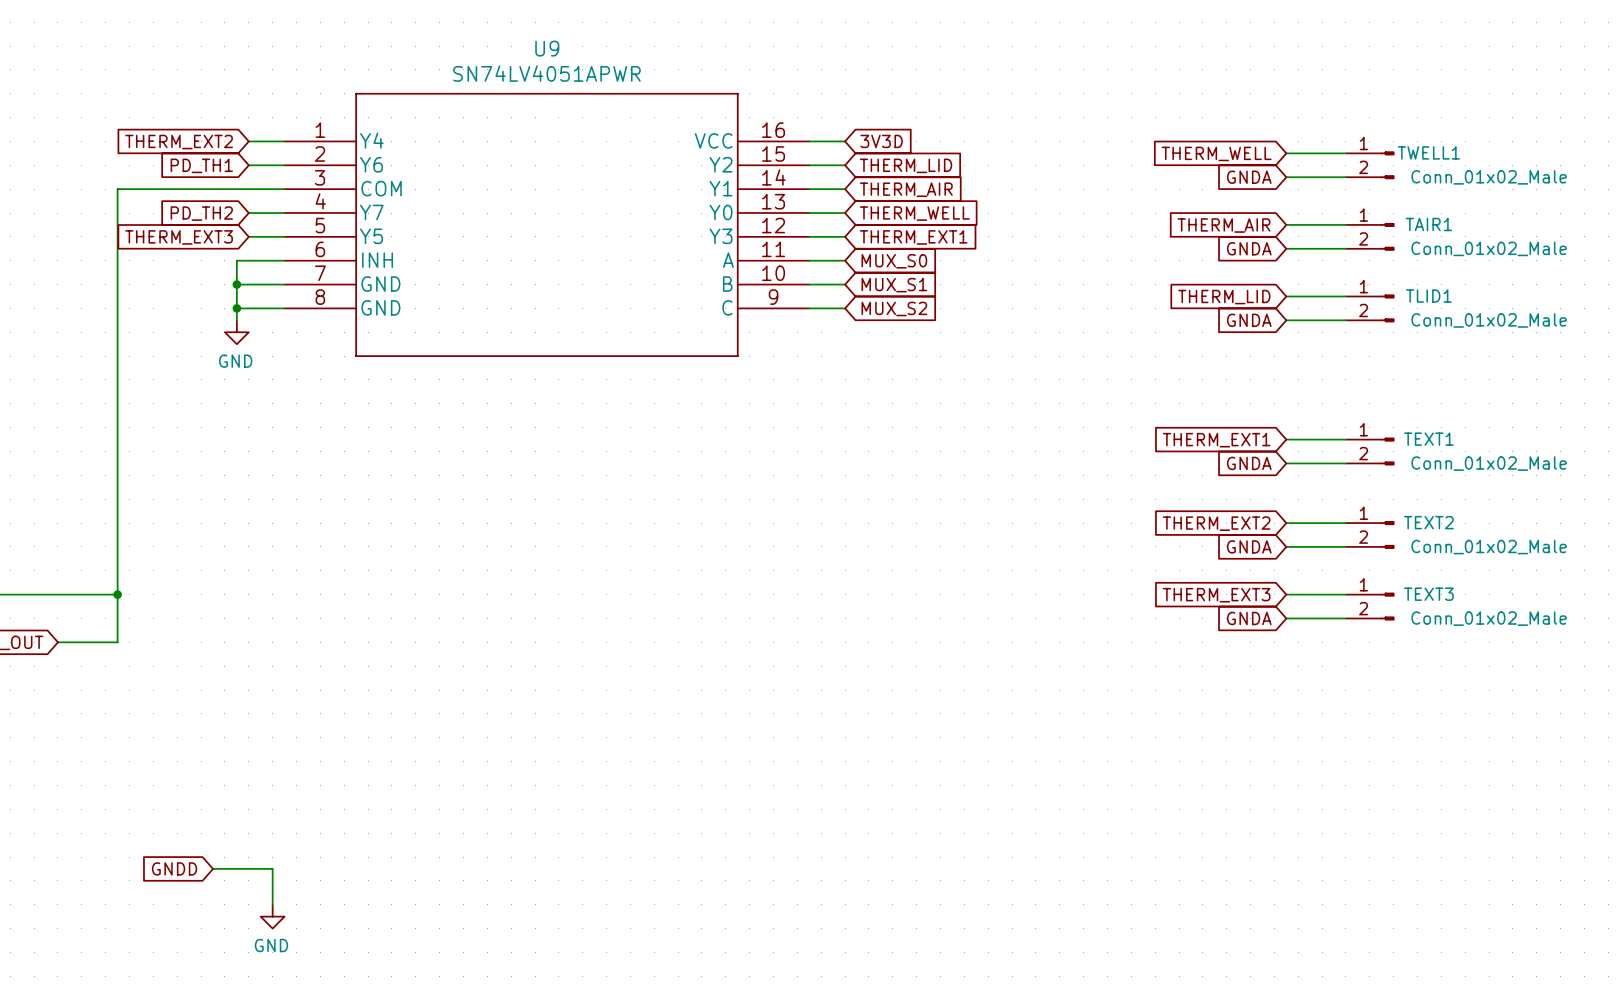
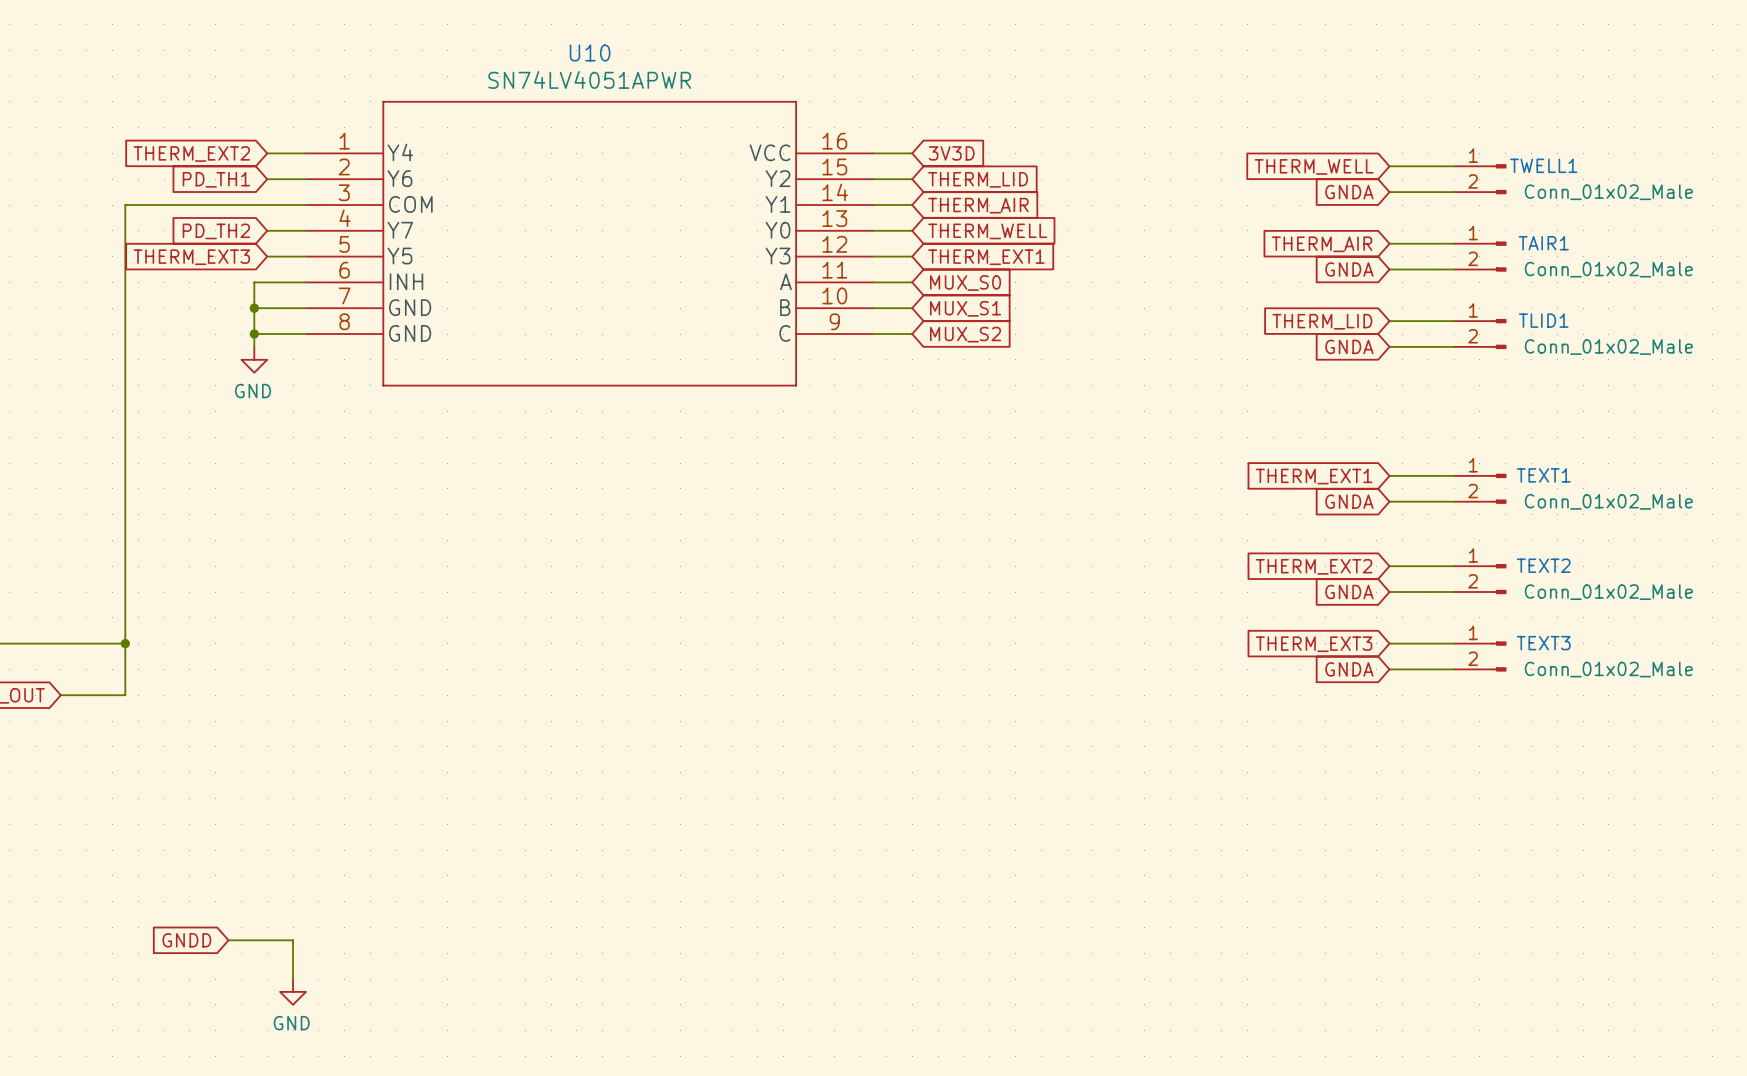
U9 name: U9 (547, 48) -> U10 (590, 52)

